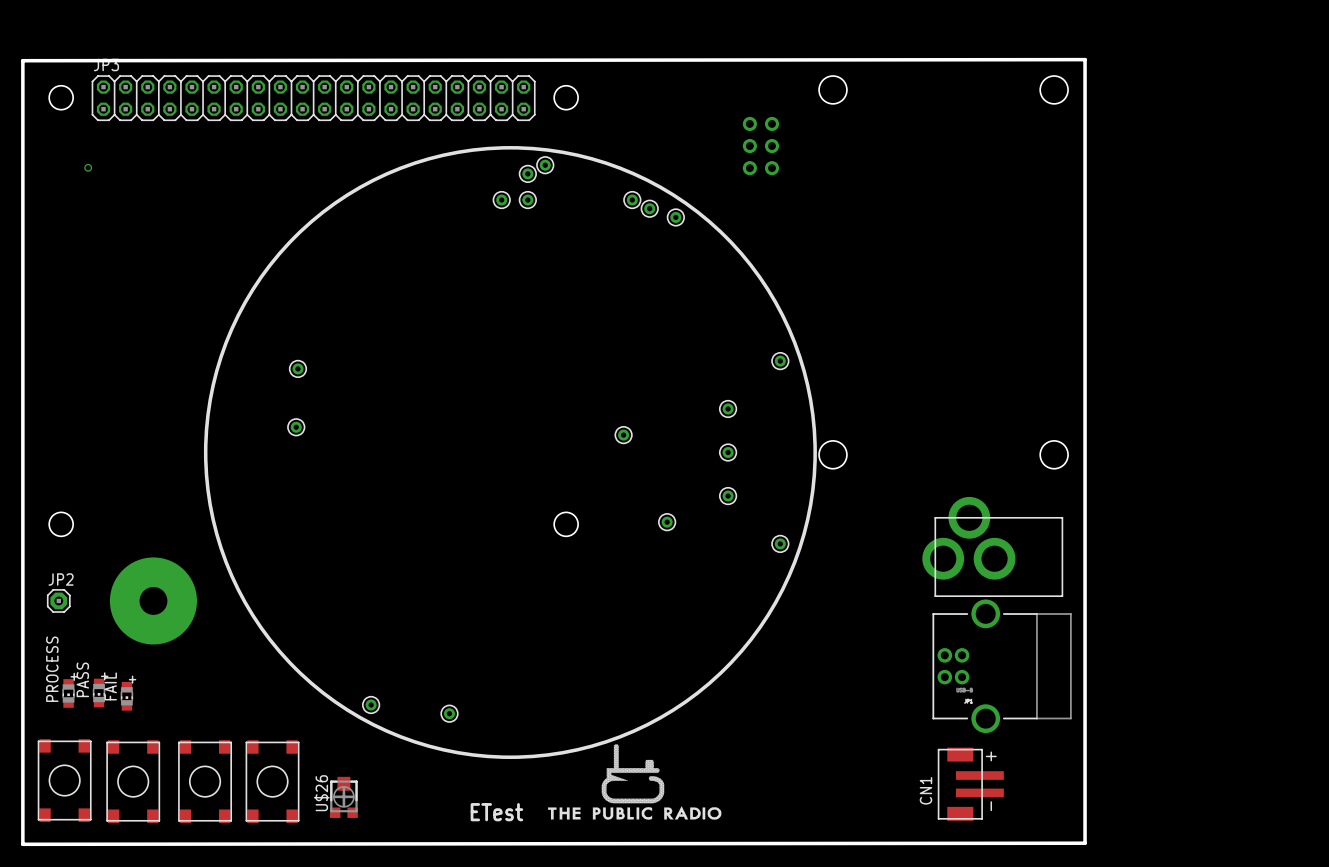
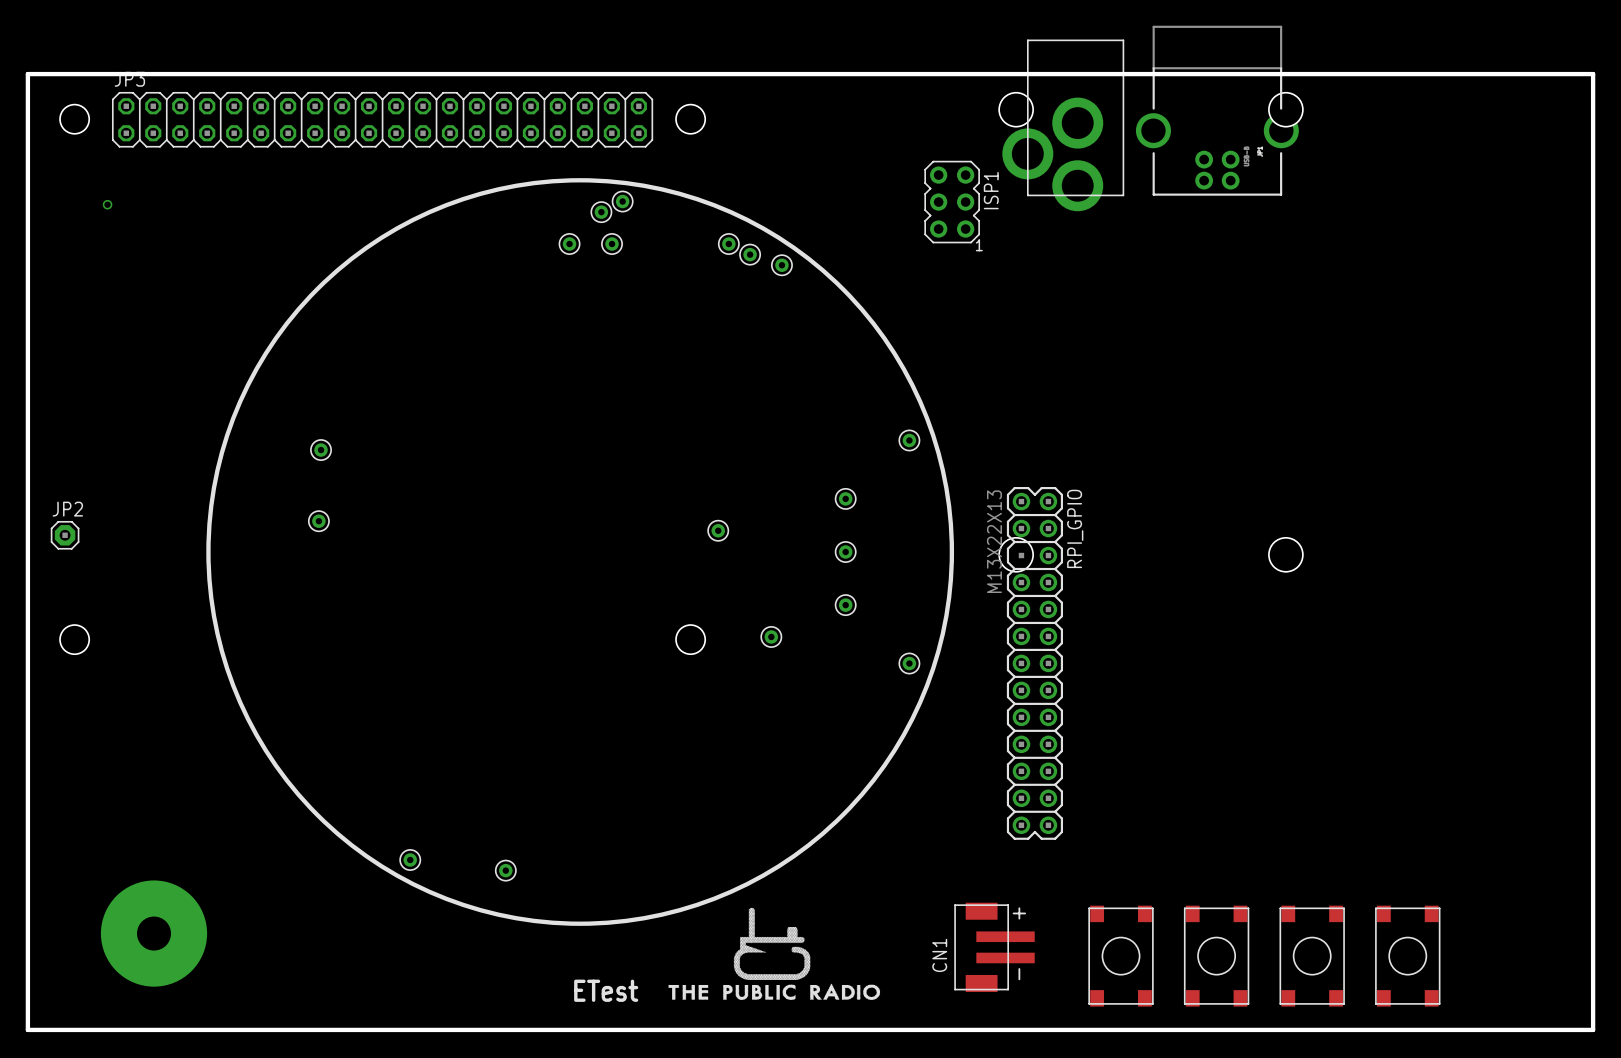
board edge: (22, 60) (1085, 59) (1085, 843) (22, 844) -> (27, 74) (1593, 74) (1593, 1029) (27, 1029)
part: none -> (1063, 125)
ISP1 side: bottom (760, 146) -> top (952, 202)
part: none -> (622, 201)
part: (545, 165) -> none
part: none -> (601, 212)
part: (527, 173) -> none
part: none -> (569, 244)
part: (527, 200) -> none
part: none -> (728, 244)
part: (632, 200) -> none
part: none -> (750, 254)
part: (649, 208) -> none
part: none -> (781, 265)
part: (675, 217) -> none
part: none -> (909, 440)
part: (780, 361) -> none
part: none -> (321, 450)
part: (297, 368) -> none
part: none -> (845, 498)
part: (728, 408) -> none
part: none -> (318, 521)
part: (296, 427) -> none
part position: (623, 435) -> (718, 530)
drawing position: (510, 452) -> (580, 552)
part: none -> (845, 552)
part: (728, 452) -> none
part: none -> (845, 605)
part: (728, 496) -> none
part: none -> (771, 636)
part: (667, 522) -> none
part: none -> (909, 663)
part: (780, 543) -> none
RPI_GPIO: none -> M13X22X13 (1034, 663)
part: (992, 546) -> none
JP2 position: (58, 600) -> (65, 535)
part position: (153, 600) -> (154, 933)
part rotation: 0° (1002, 666) -> 90° counterclockwise (1217, 110)
part position: (1002, 666) -> (1217, 110)
PROCESS: (68, 693) -> none
PASS: (99, 693) -> none
FAIL: (126, 696) -> none
part: none -> (410, 860)
part: (371, 705) -> none
part: none -> (505, 870)
part: (449, 713) -> none
part: (64, 780) -> none
part: (133, 781) -> none
part: (205, 781) -> none
part: (272, 781) -> none
part: none -> (1121, 956)
part: none -> (1216, 956)
part: none -> (1312, 956)
part: none -> (1407, 956)
CN1 position: (970, 784) -> (994, 947)
U$26: (343, 797) -> none

